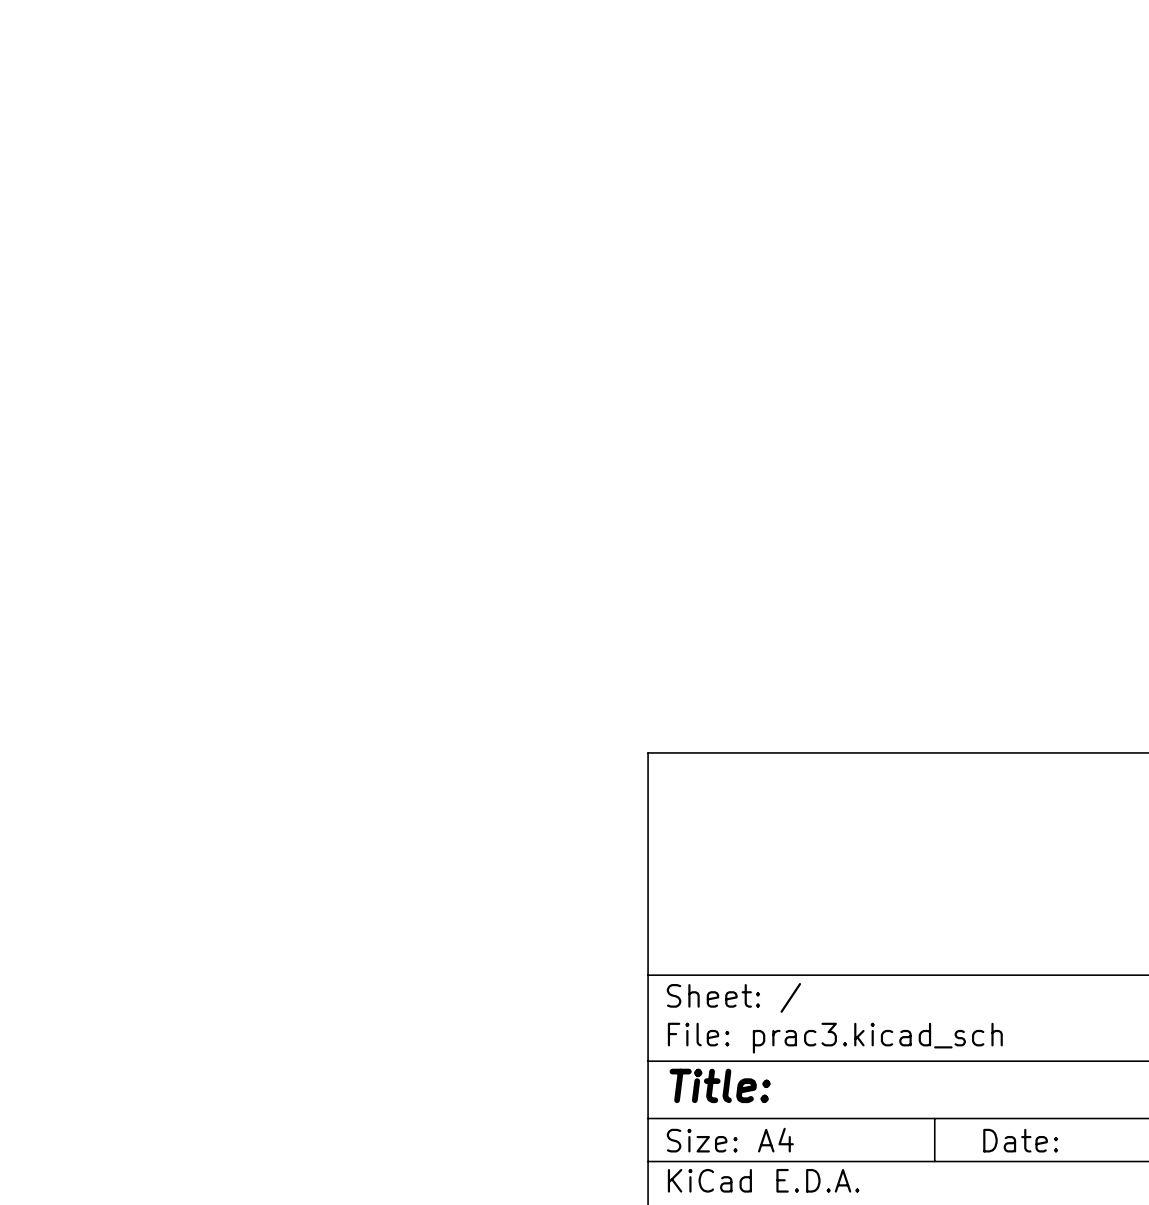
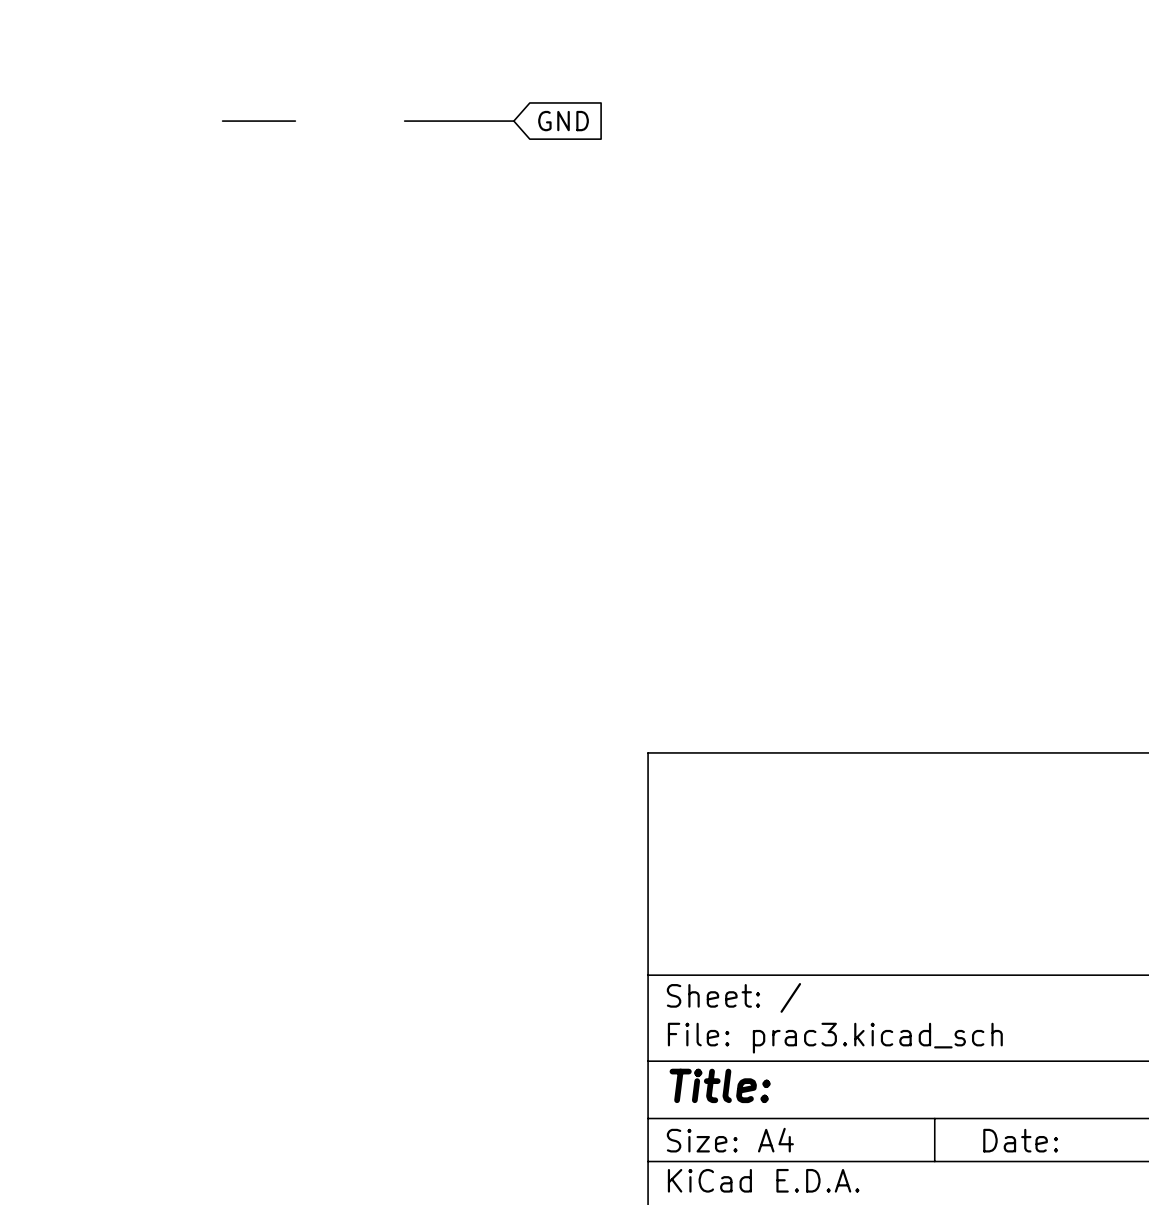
wire: none -> (222, 121) (295, 121)
wire: none -> (404, 121) (513, 121)
global label: none -> GND (563, 121)

